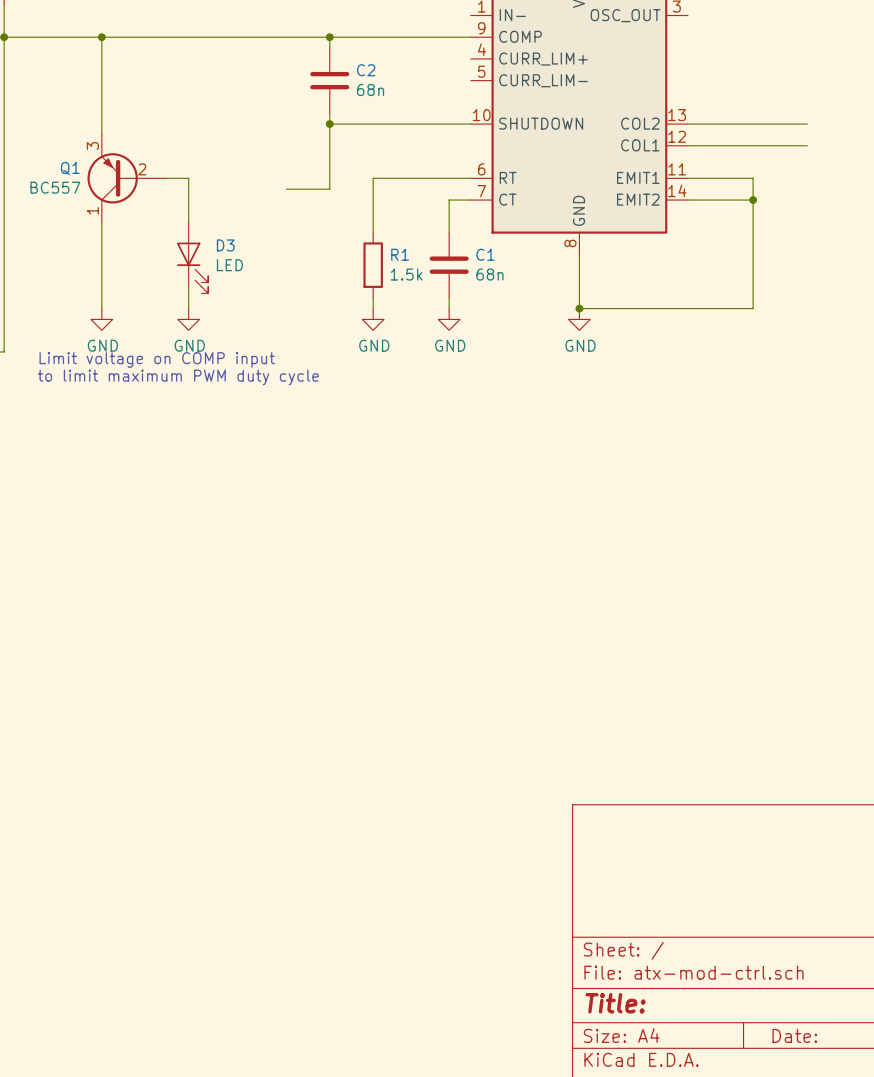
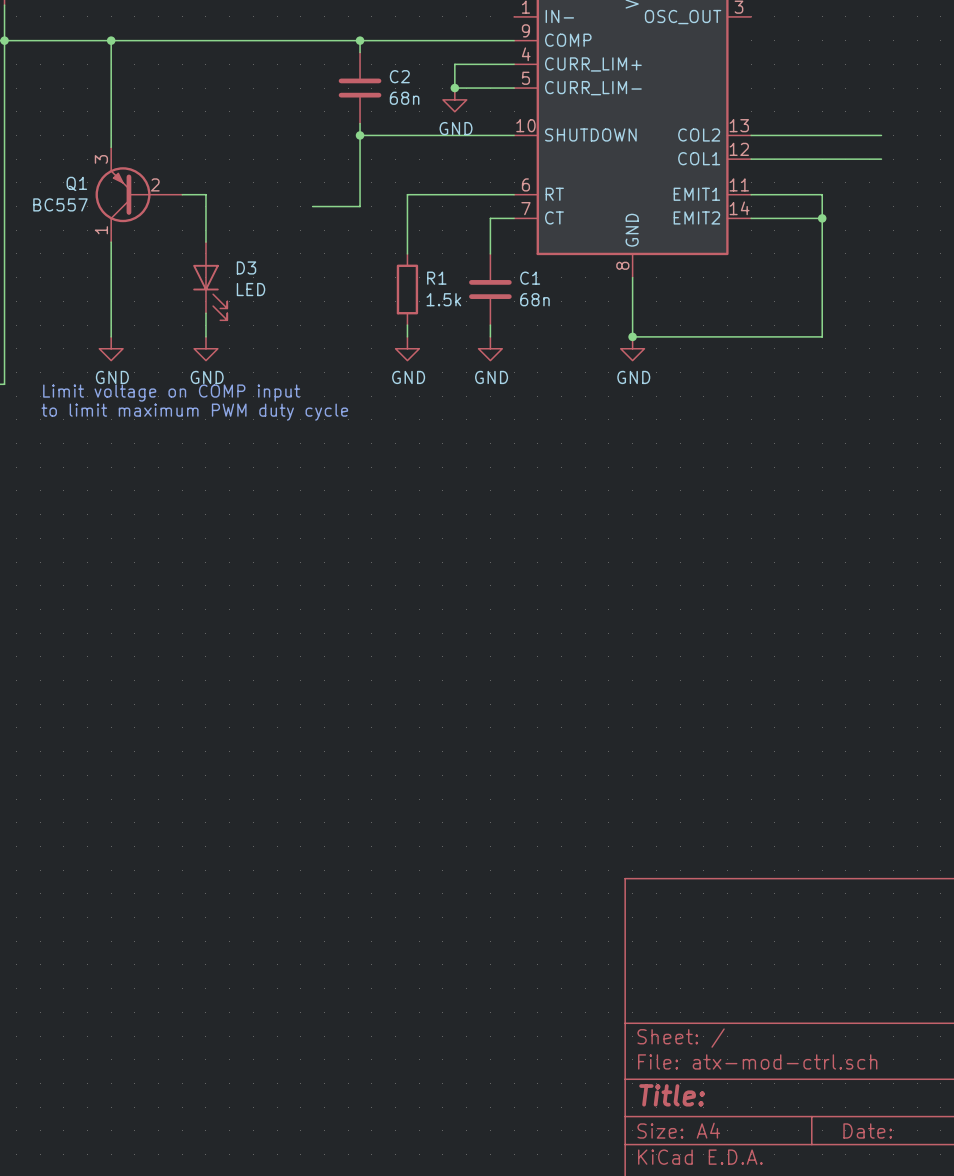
wire: none -> (514, 64) (454, 64) (454, 88) (514, 88)
junction: none -> (454, 88)
power symbol: none -> GND (454, 99)

